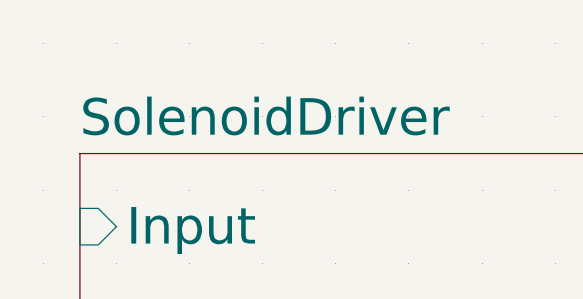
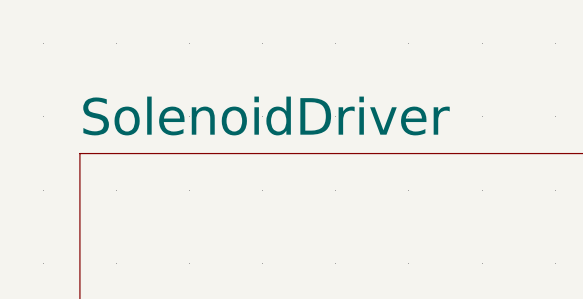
sheet pin: Input (193, 230) -> none

